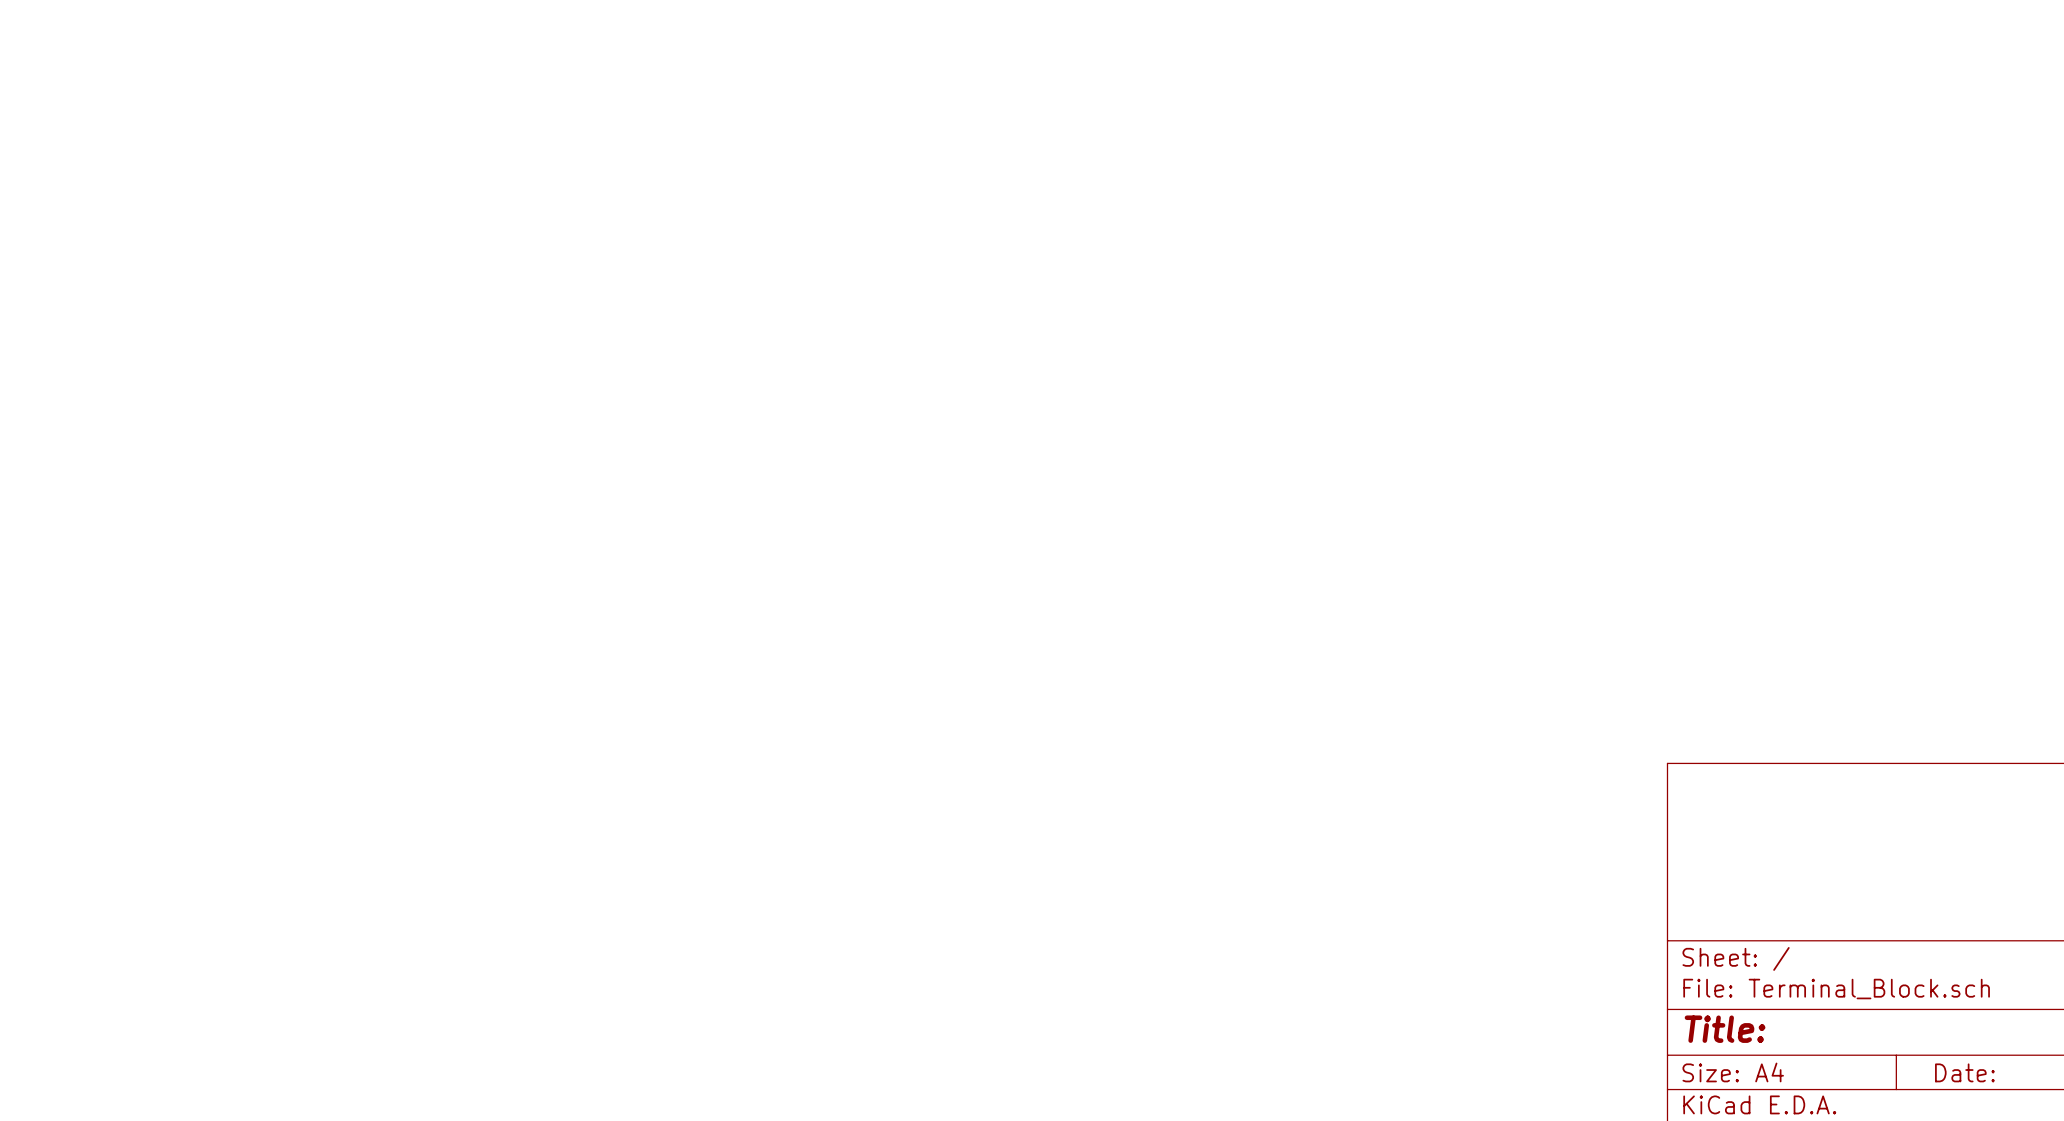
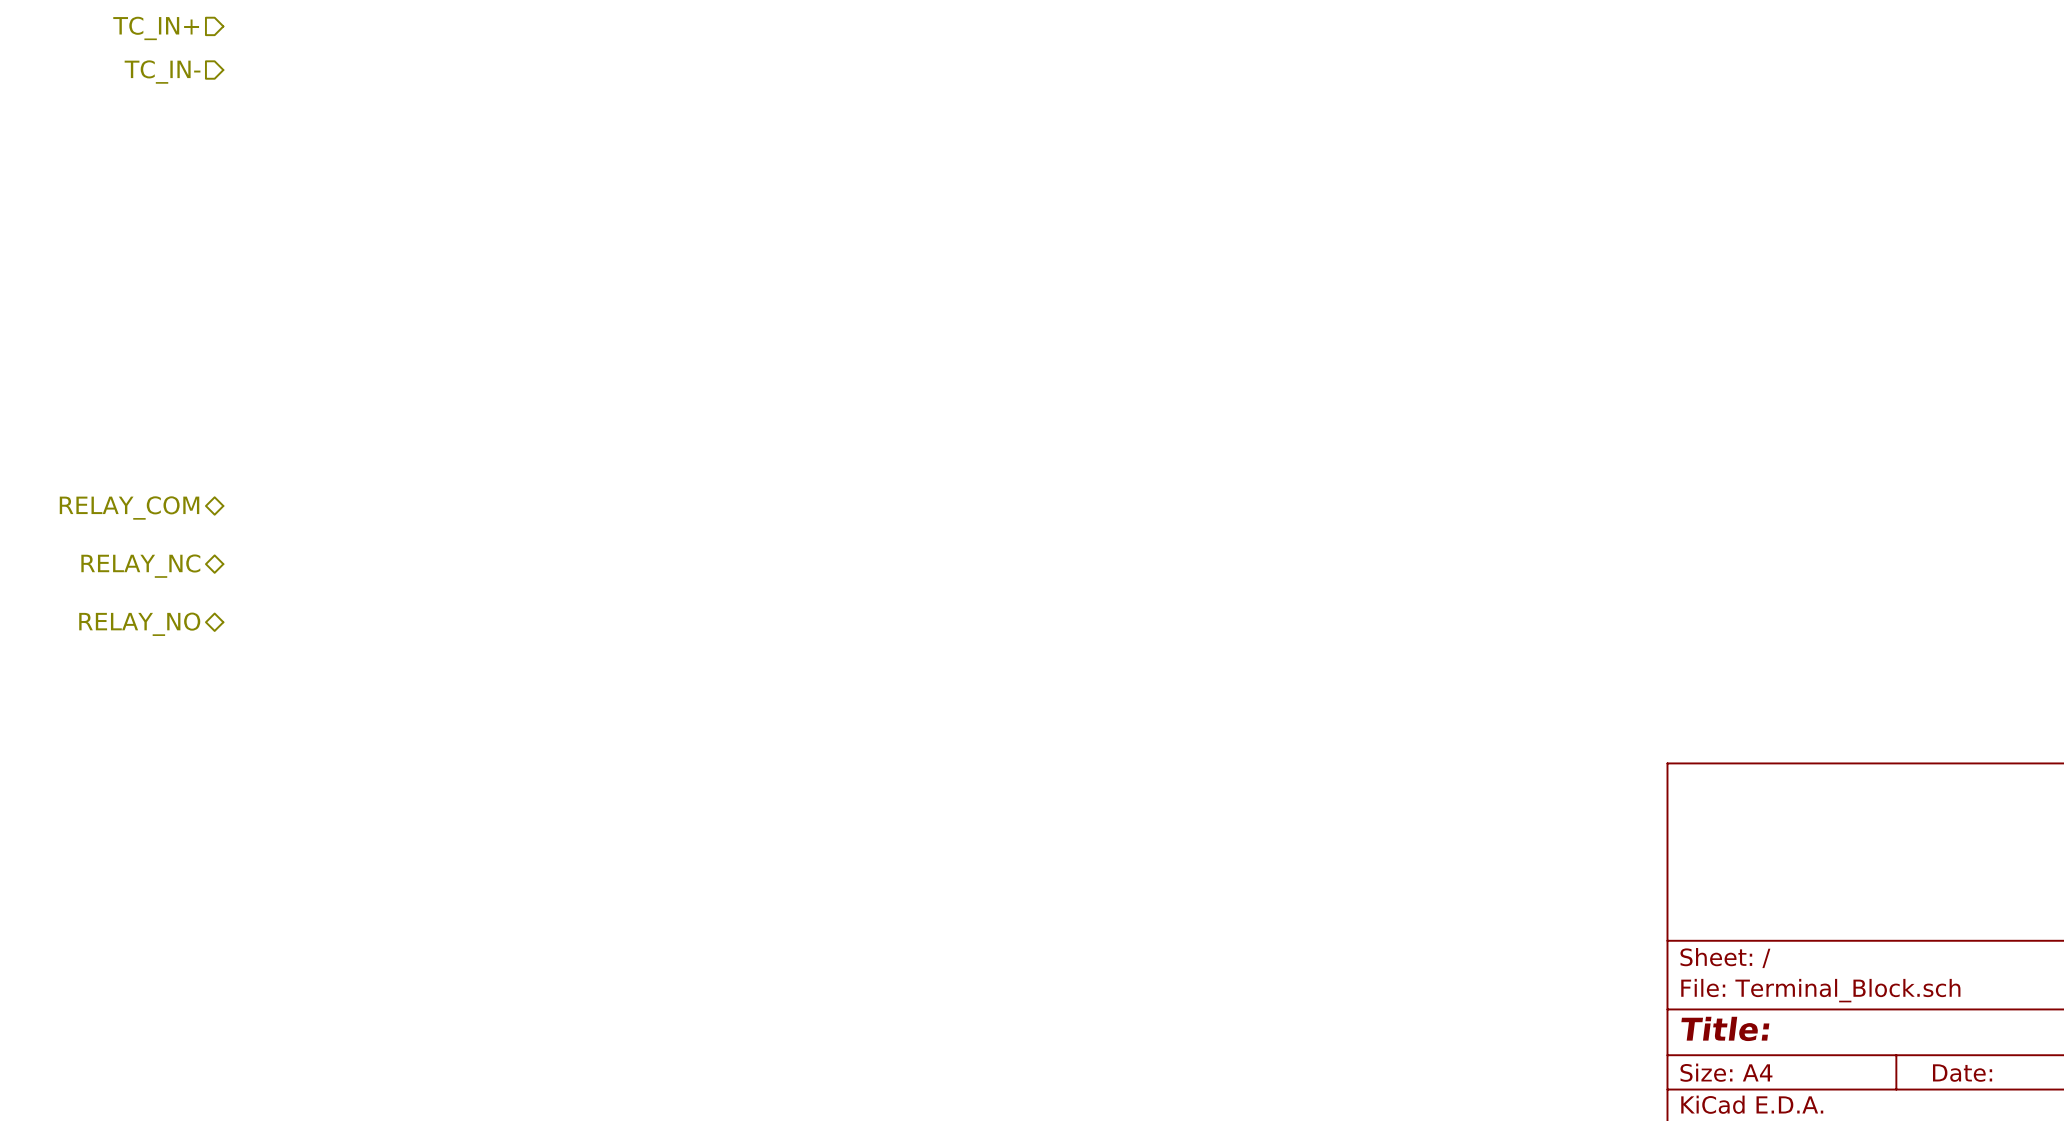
hierarchical label: none -> TC_IN+ (156, 28)
hierarchical label: none -> TC_IN- (162, 72)
hierarchical label: none -> RELAY_COM (129, 508)
hierarchical label: none -> RELAY_NC (140, 566)
hierarchical label: none -> RELAY_NO (139, 624)

